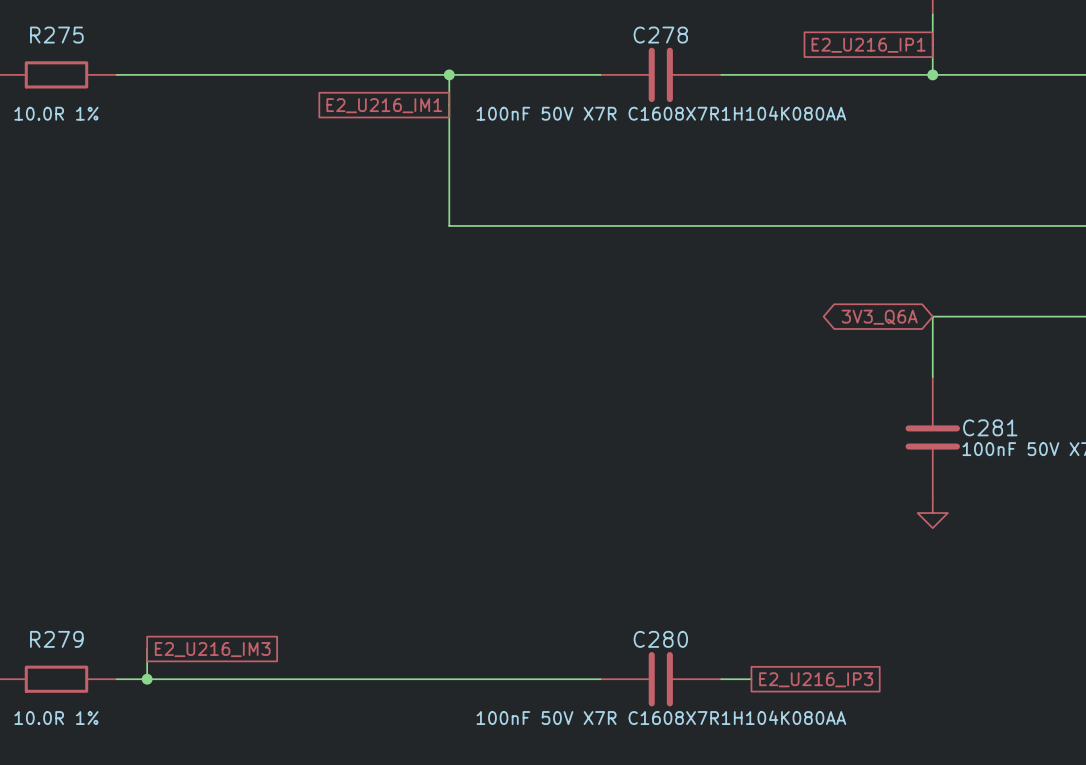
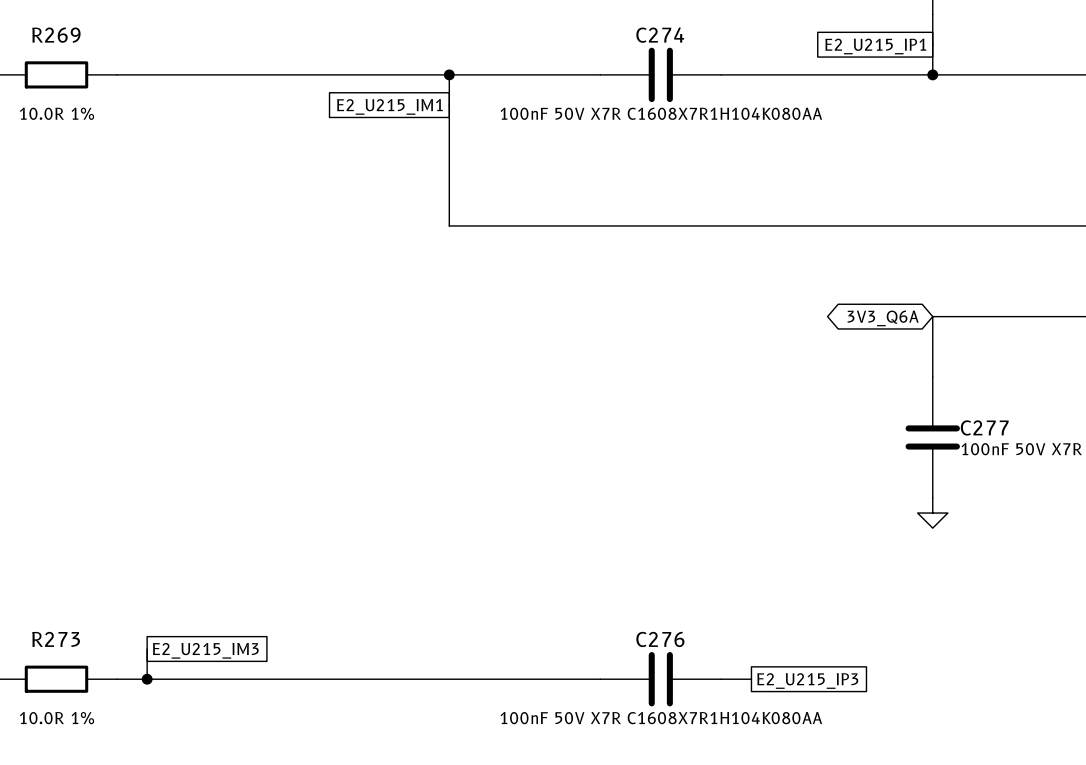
R275 name: R275 (56, 35) -> R269 (56, 35)
C278 name: C278 (660, 35) -> C274 (660, 35)
global label: E2_U216_IP1 (868, 45) -> E2_U215_IP1 (875, 46)
global label: E2_U216_IM1 (384, 105) -> E2_U215_IM1 (389, 106)
C281 name: C281 (990, 427) -> C277 (984, 427)
R279 name: R279 (56, 639) -> R273 (56, 639)
C280 name: C280 (660, 639) -> C276 (660, 639)
global label: E2_U216_IM3 (212, 649) -> E2_U215_IM3 (205, 650)
global label: E2_U216_IP3 (816, 679) -> E2_U215_IP3 (807, 681)

